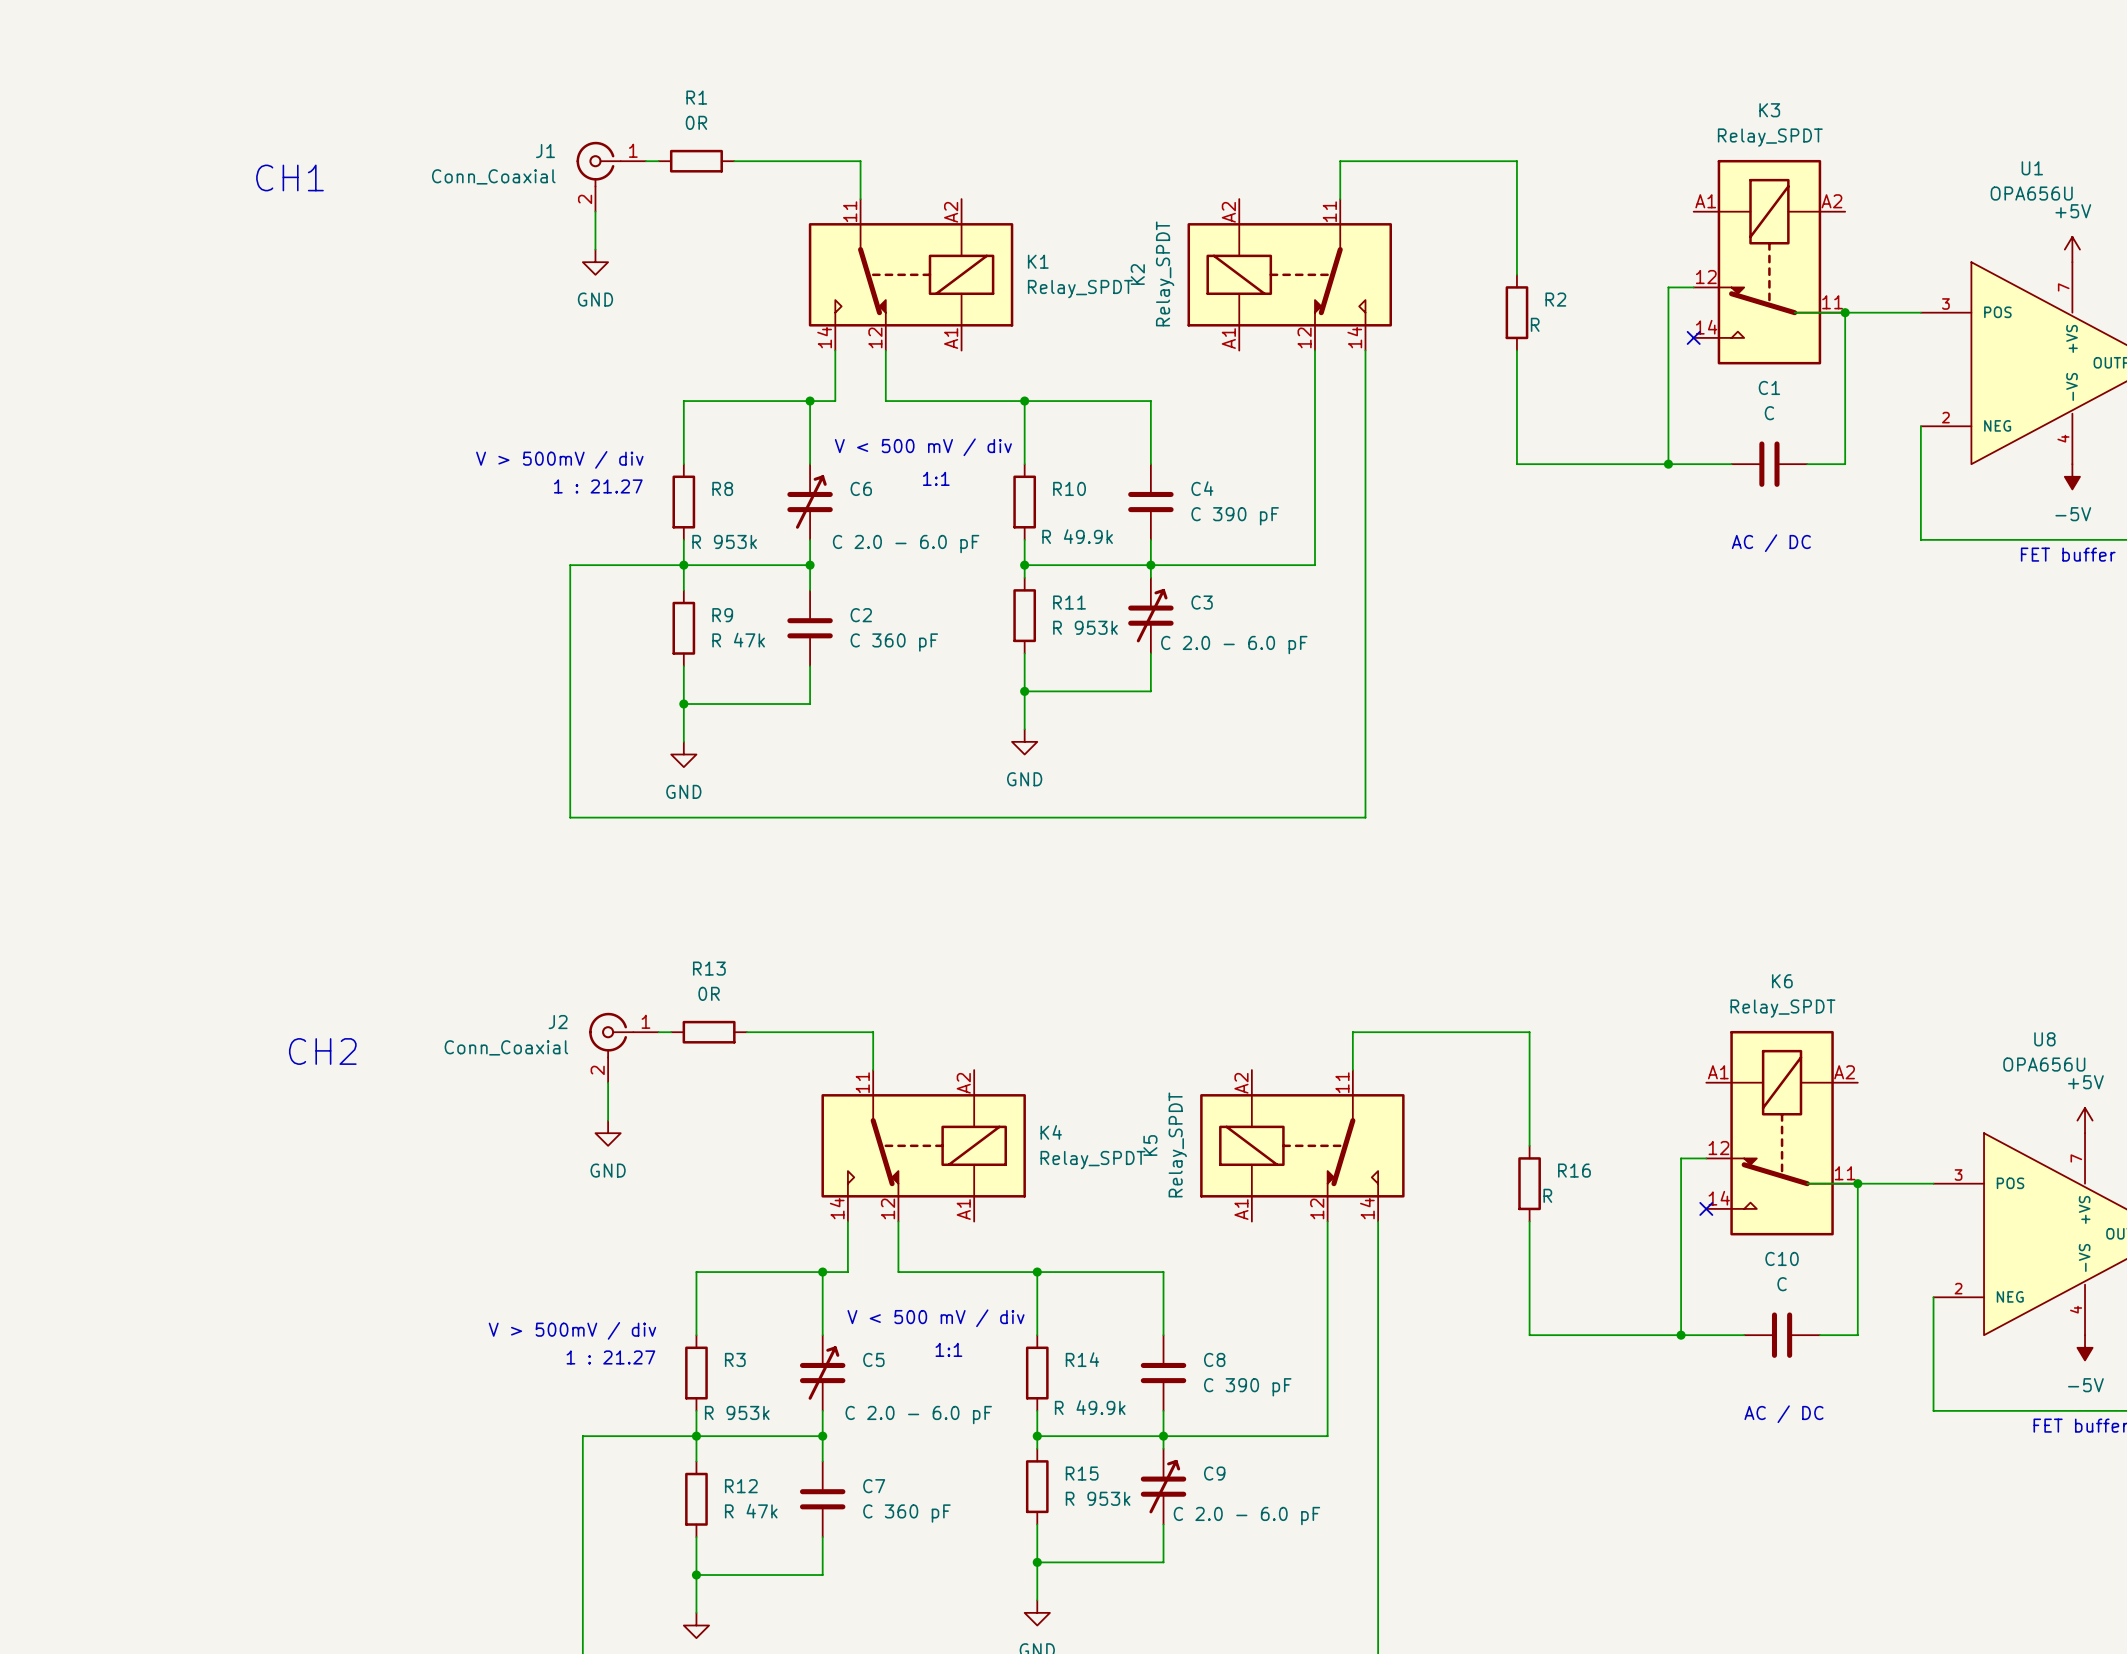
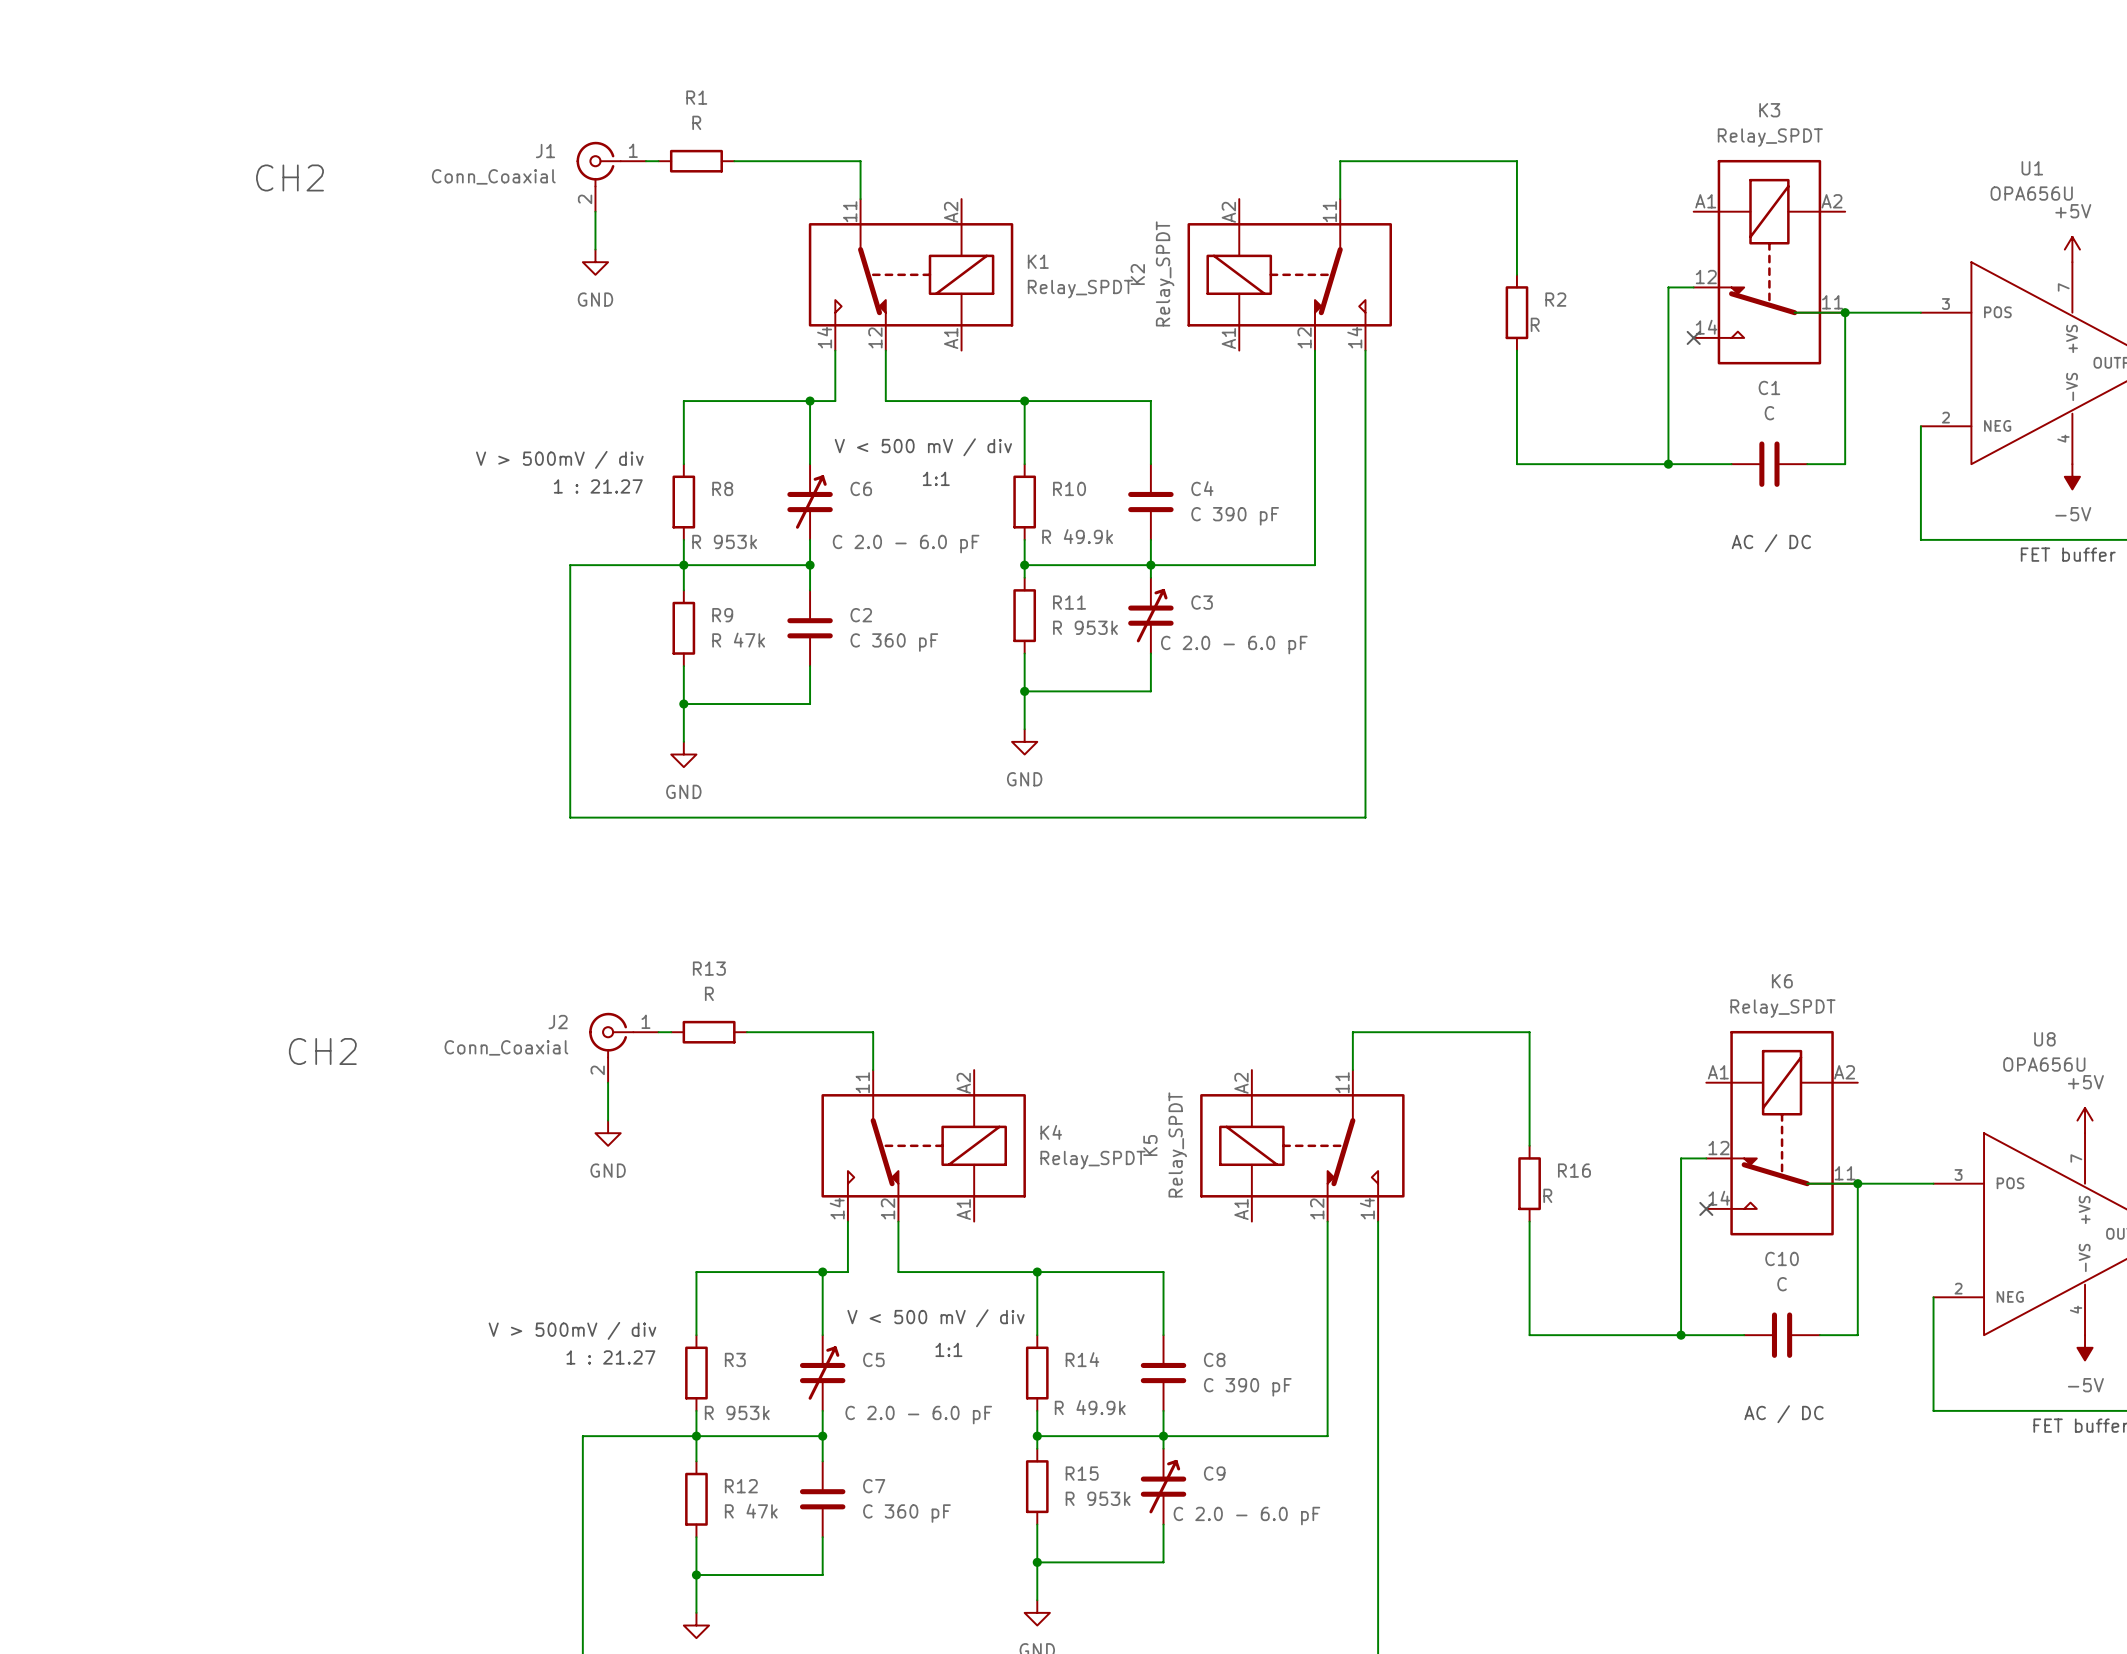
R1 value: 0R (696, 122) -> R (696, 122)
text: CH1 (289, 177) -> CH2 (289, 177)
R13 value: 0R (709, 993) -> R (709, 993)

